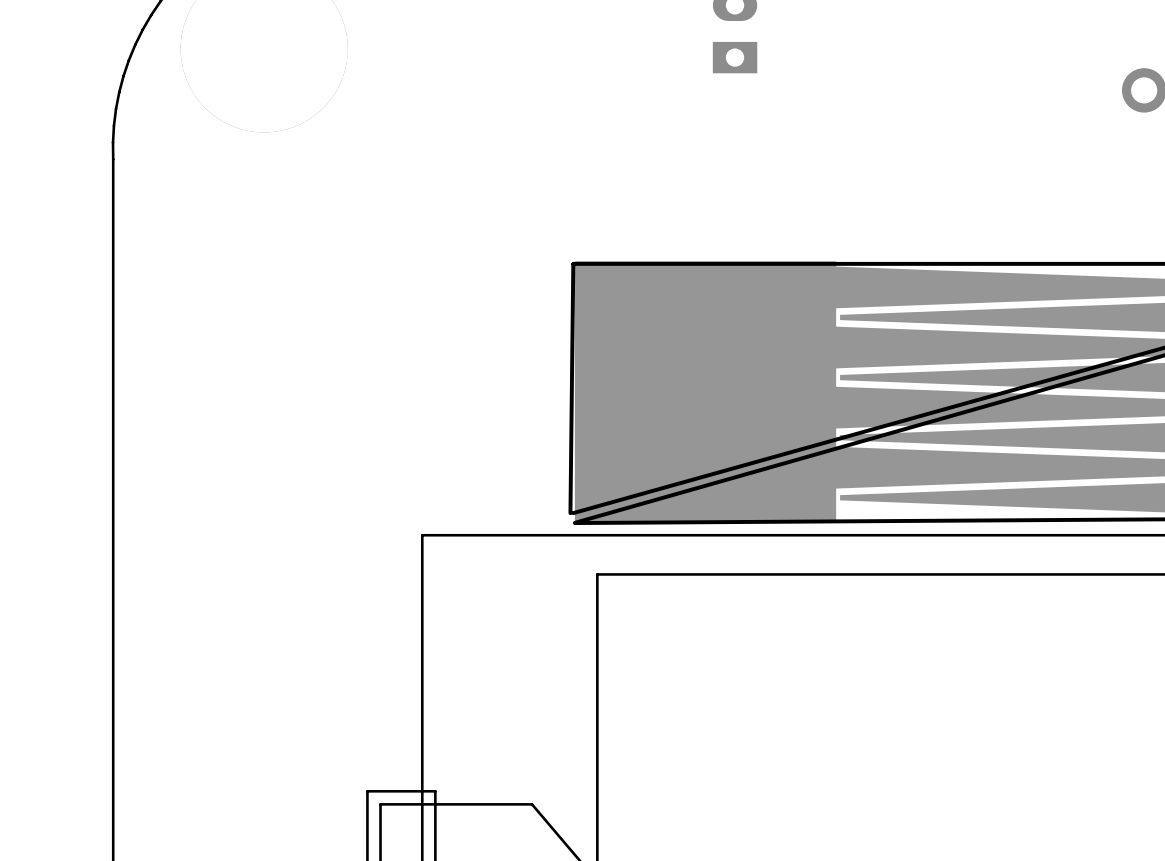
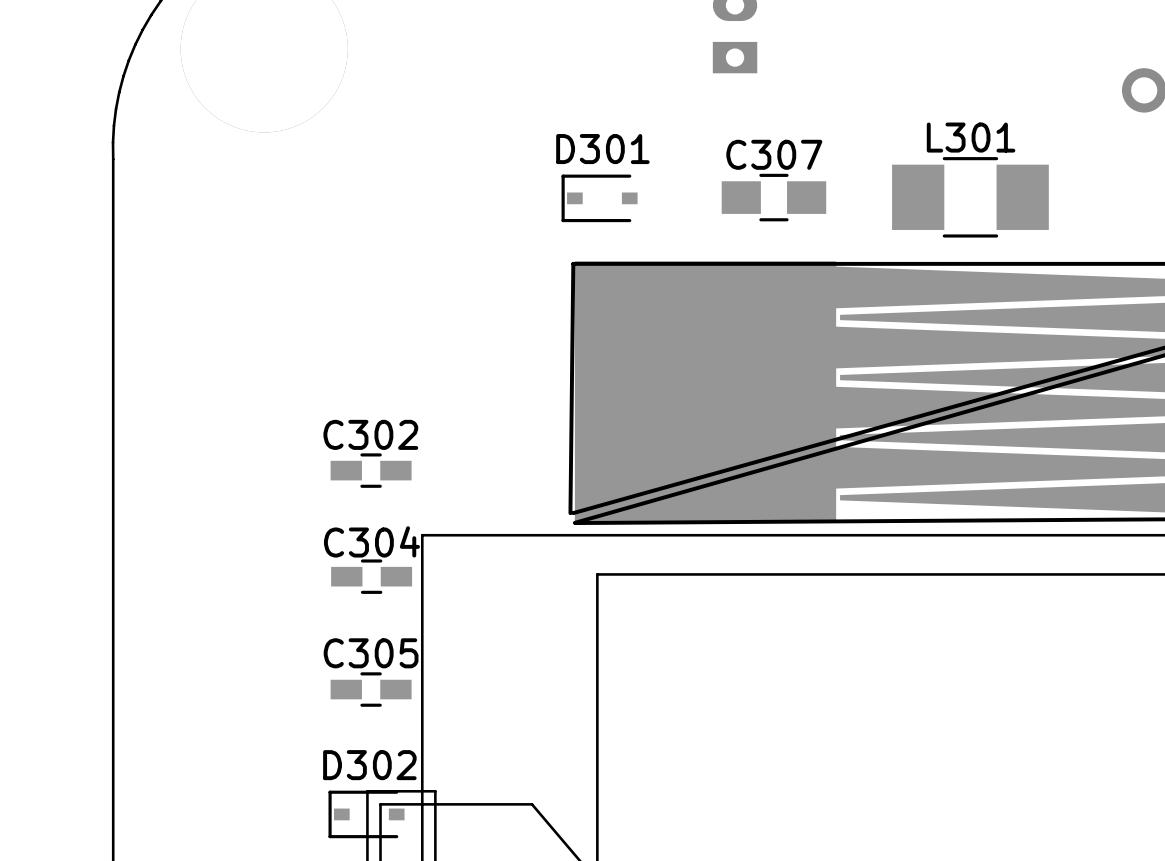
C307: none -> (773, 197)
L301: none -> (970, 197)
D301: none -> (599, 198)
C302: none -> (371, 470)
C304: none -> (371, 576)
C305: none -> (371, 689)
D302: none -> (366, 814)

